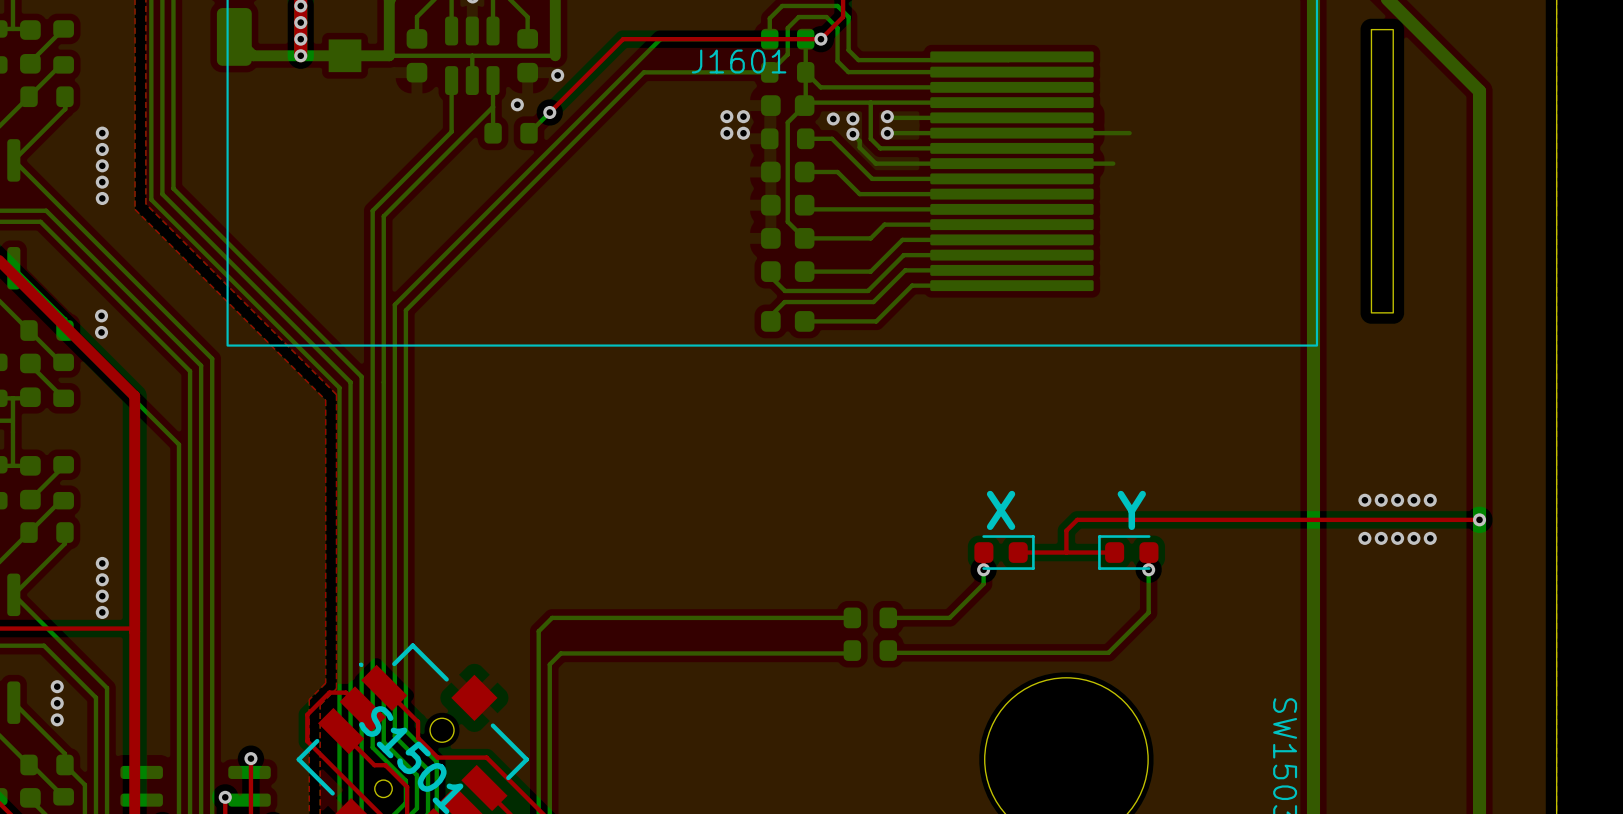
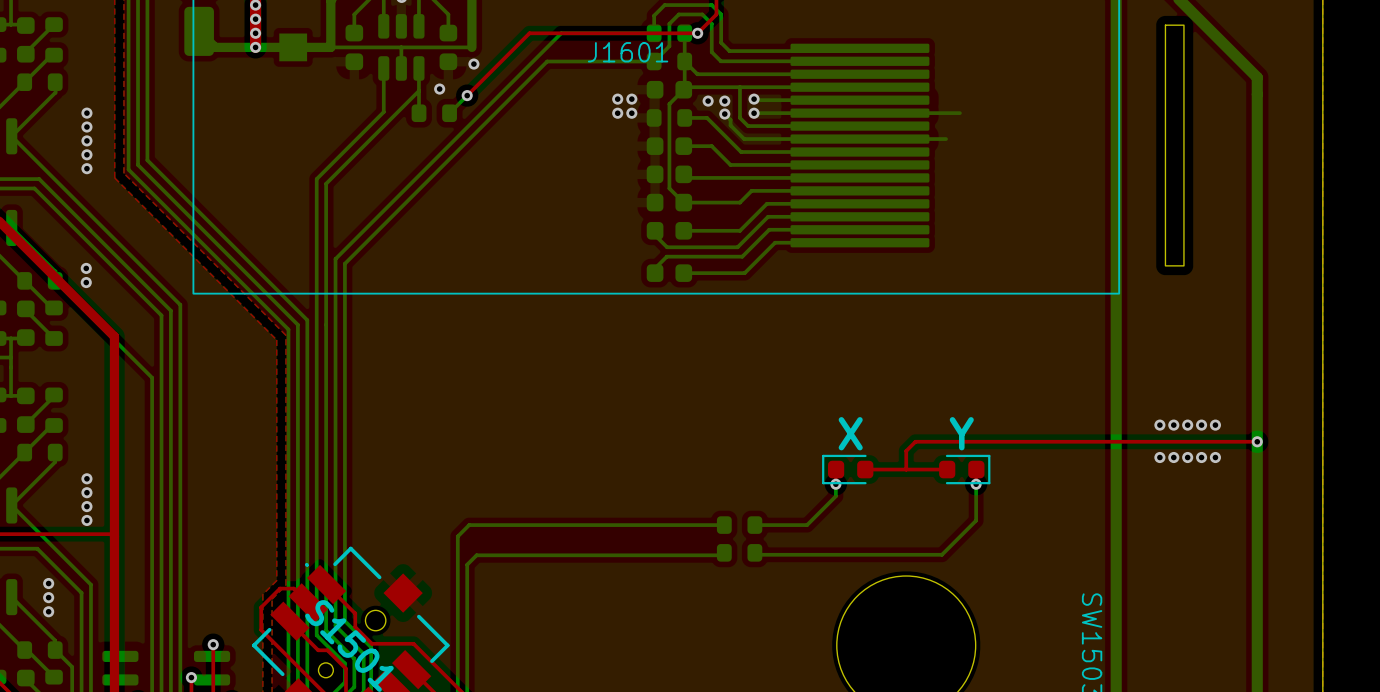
part rotation: 0° (1004, 552) -> 180° (847, 469)
part rotation: 0° (1128, 552) -> 180° (964, 469)

